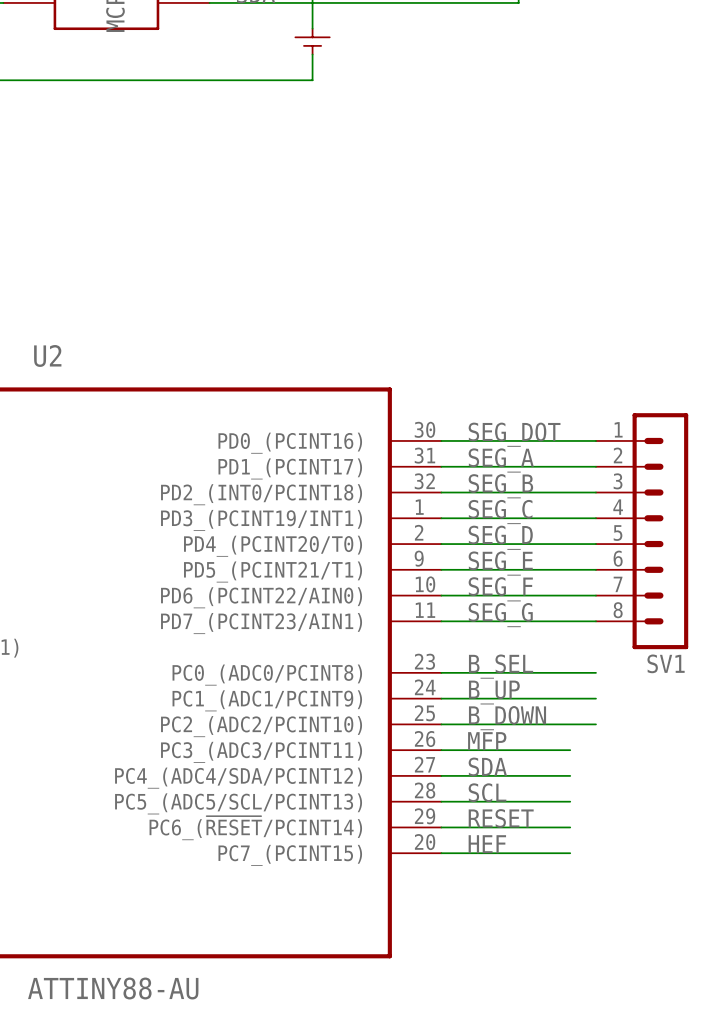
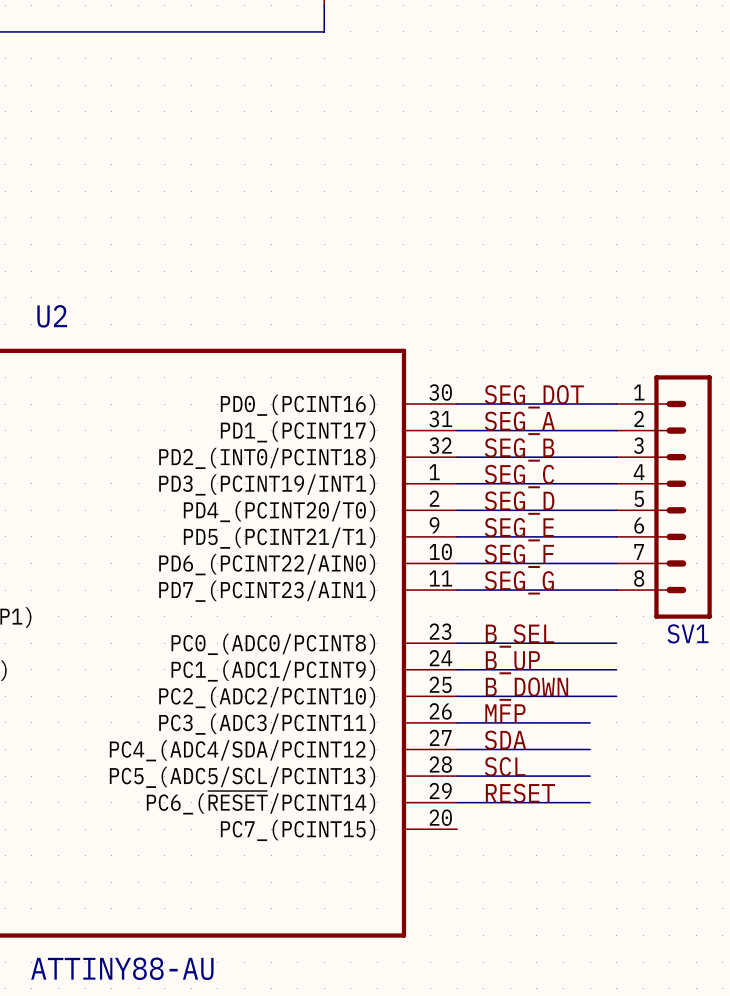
label: HEF (487, 844) -> none
wire: (441, 853) (570, 853) -> none

